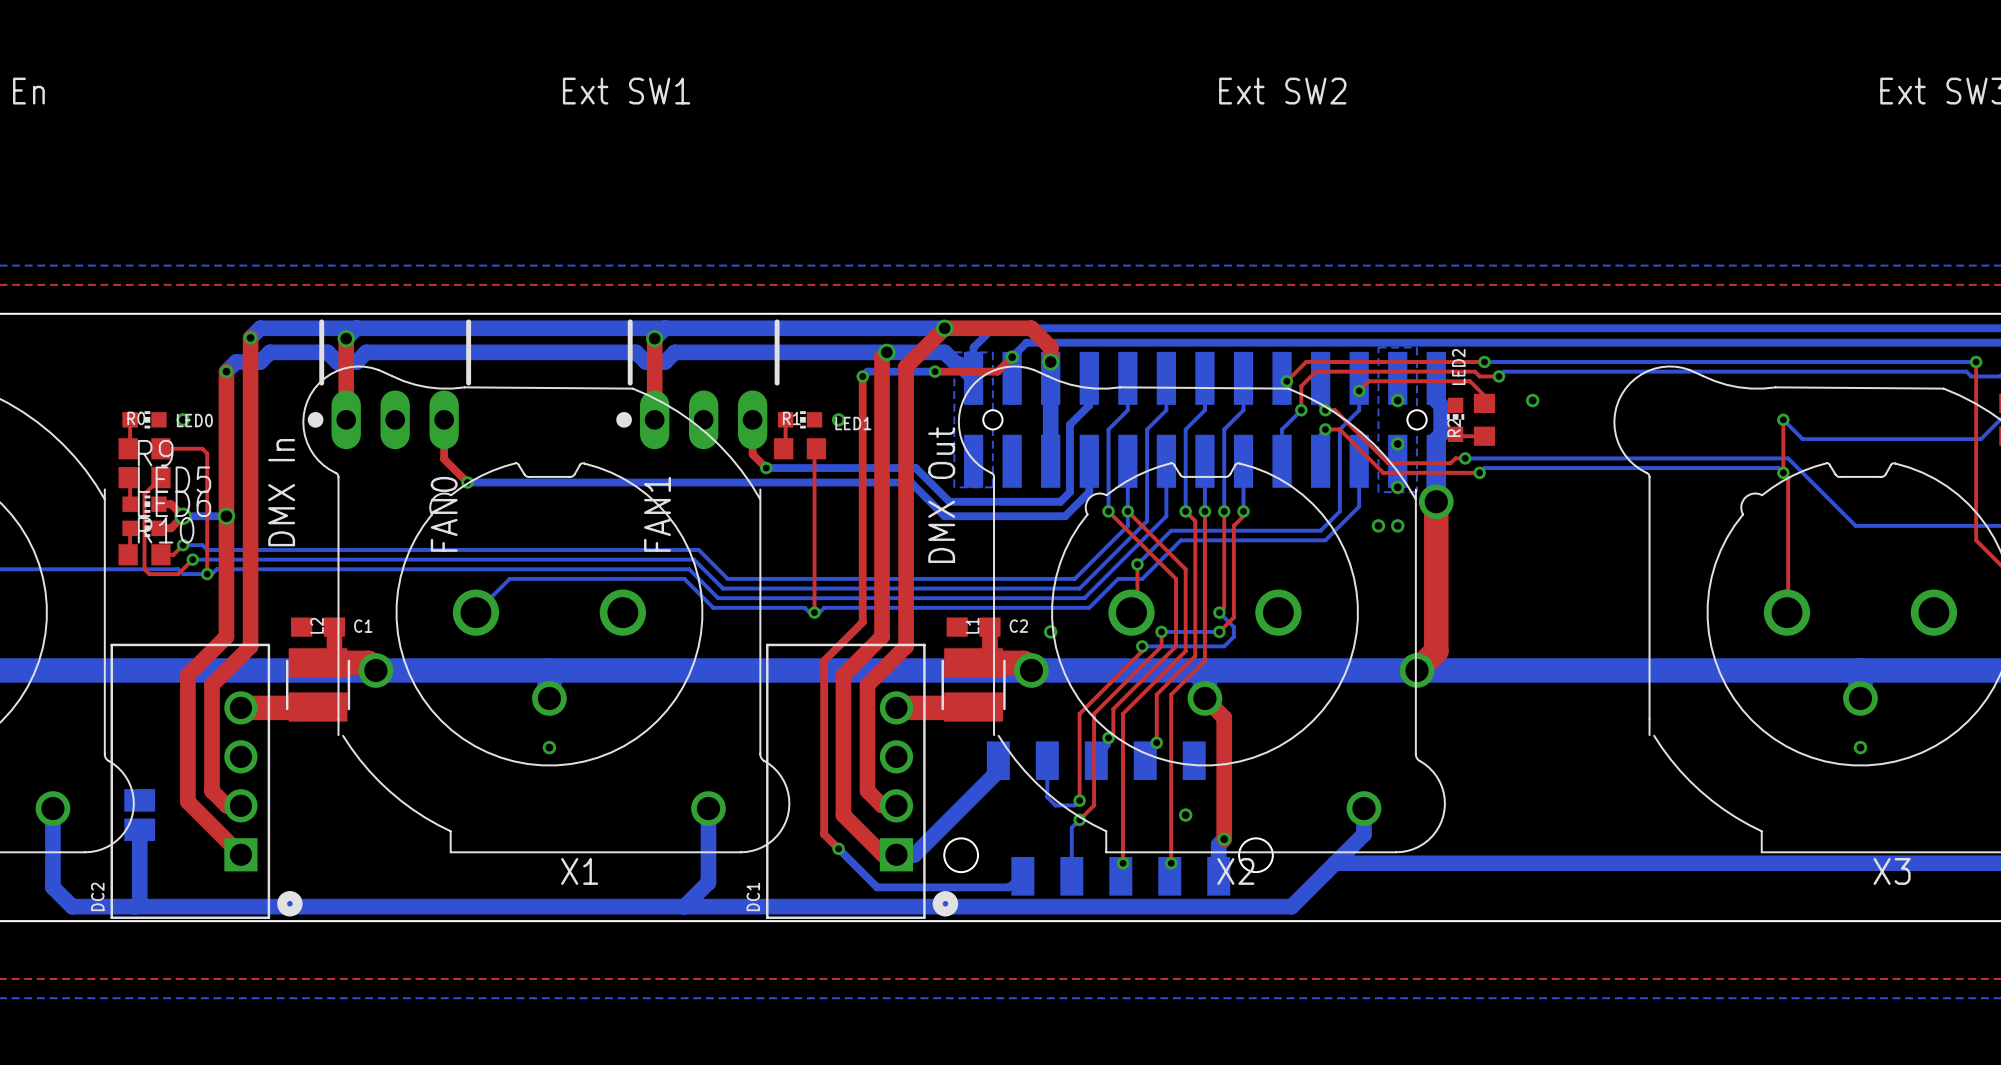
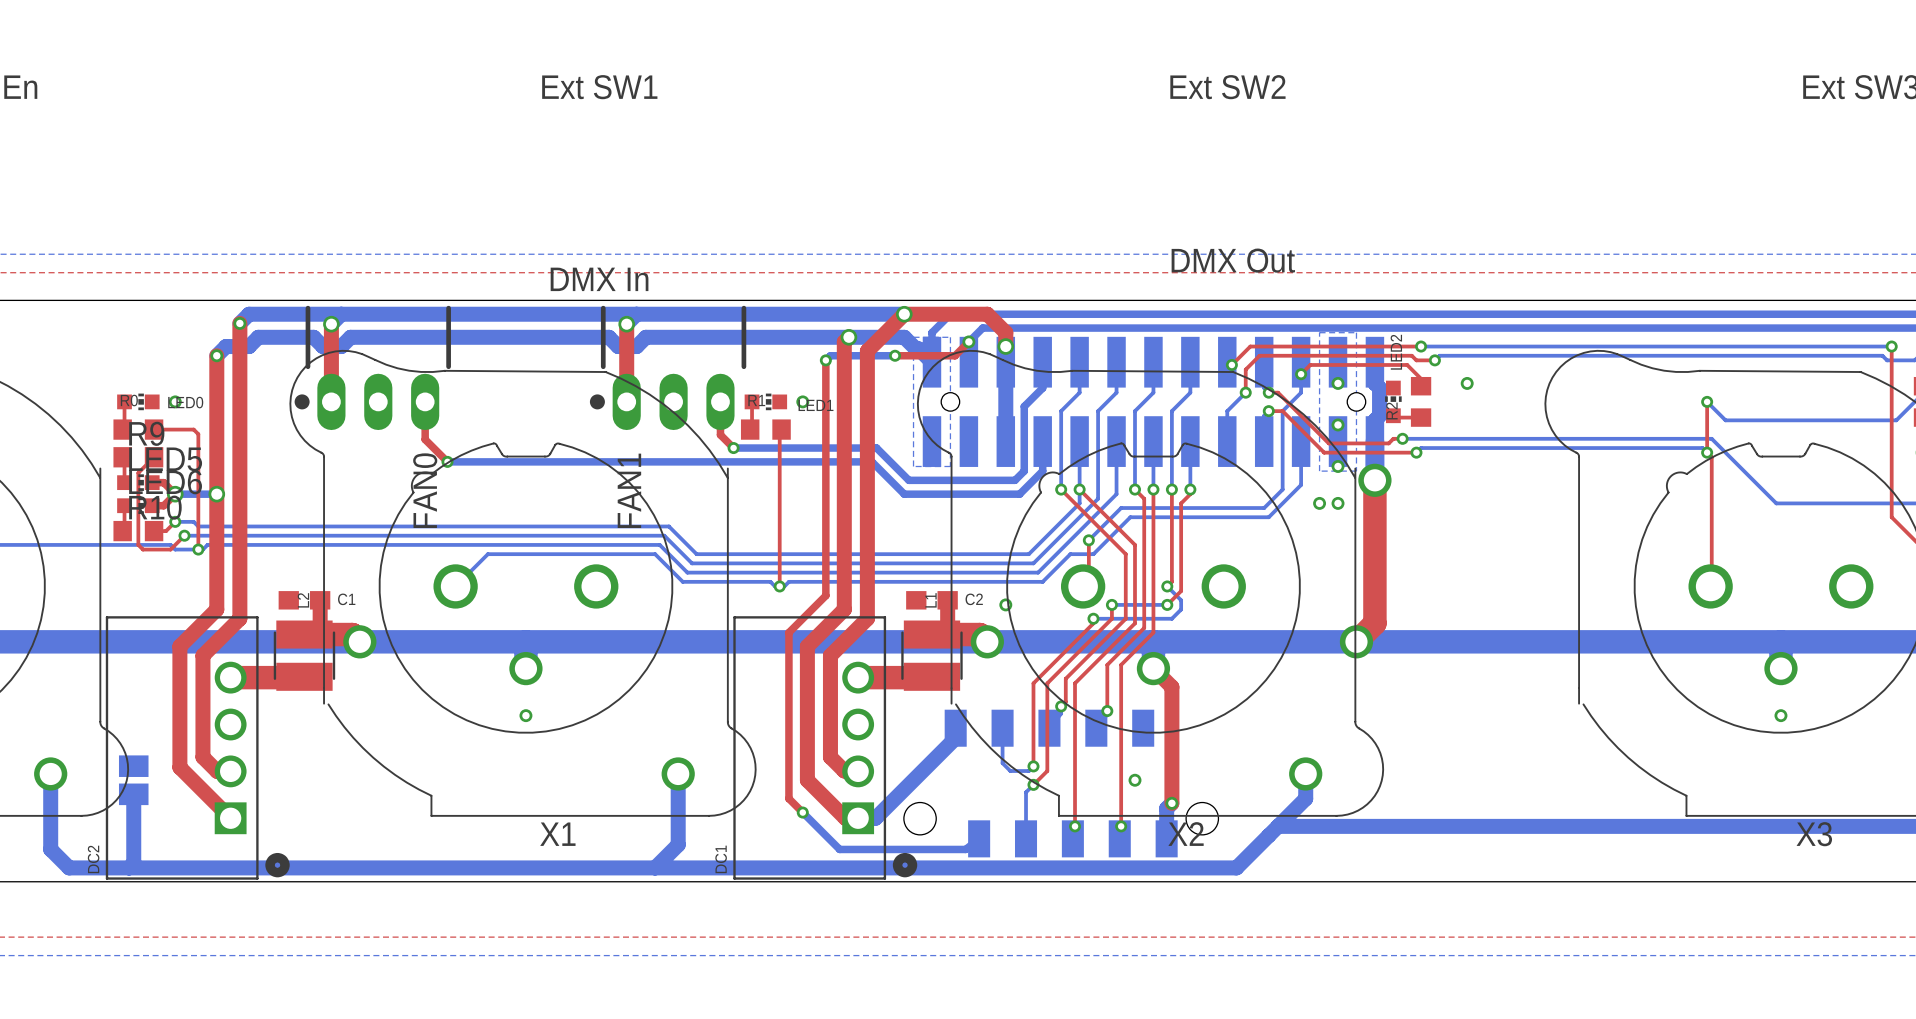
text rotation: 0° (281, 492) -> 90° clockwise (599, 279)
text position: DMX In (281, 492) -> DMX In (599, 279)
text rotation: 0° (941, 495) -> 90° clockwise (1233, 260)
text position: DMX Out (941, 495) -> DMX Out (1233, 260)

